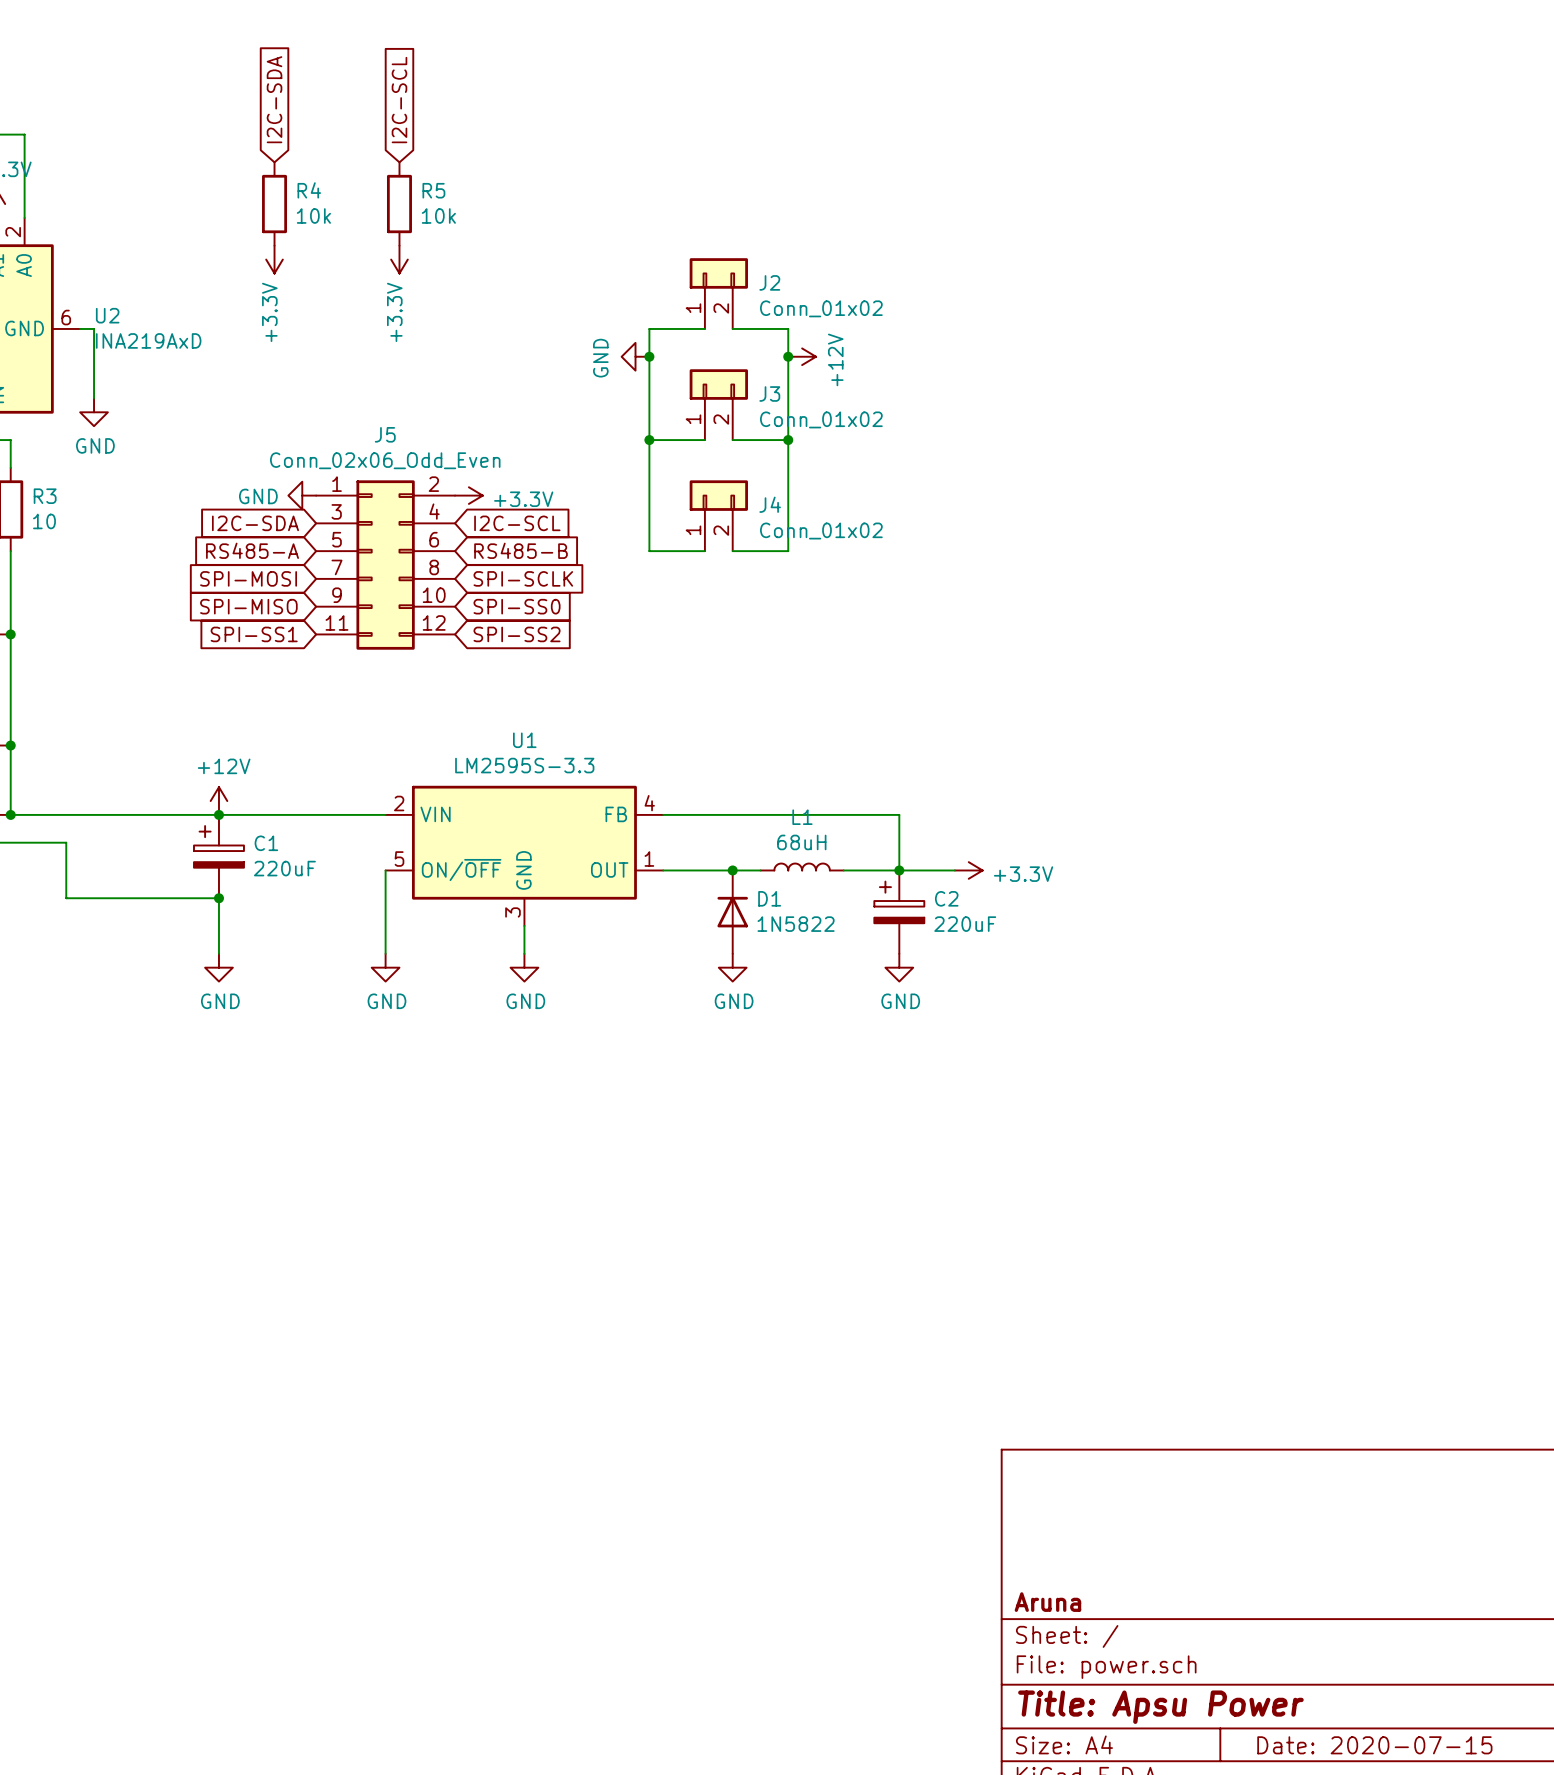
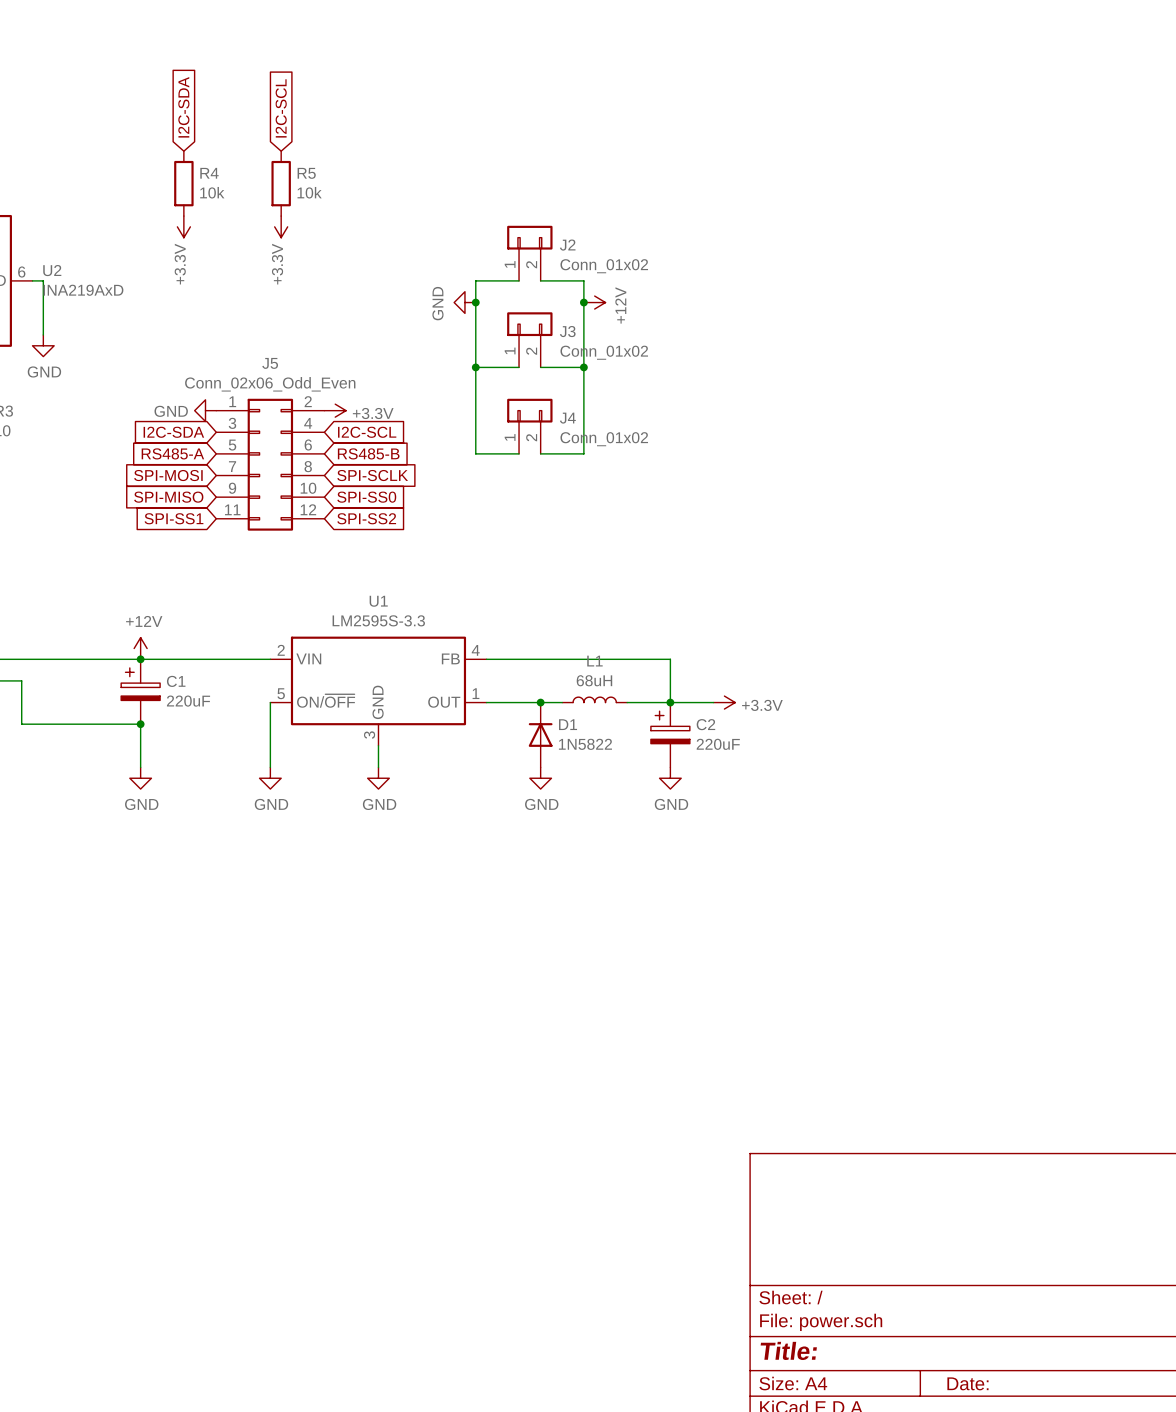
title block: Aruna (1047, 1602) -> none
title block: Title: Apsu Power (1160, 1707) -> Title: (788, 1350)
title block: Date: 2020-07-15 (1374, 1745) -> Date: (967, 1383)

